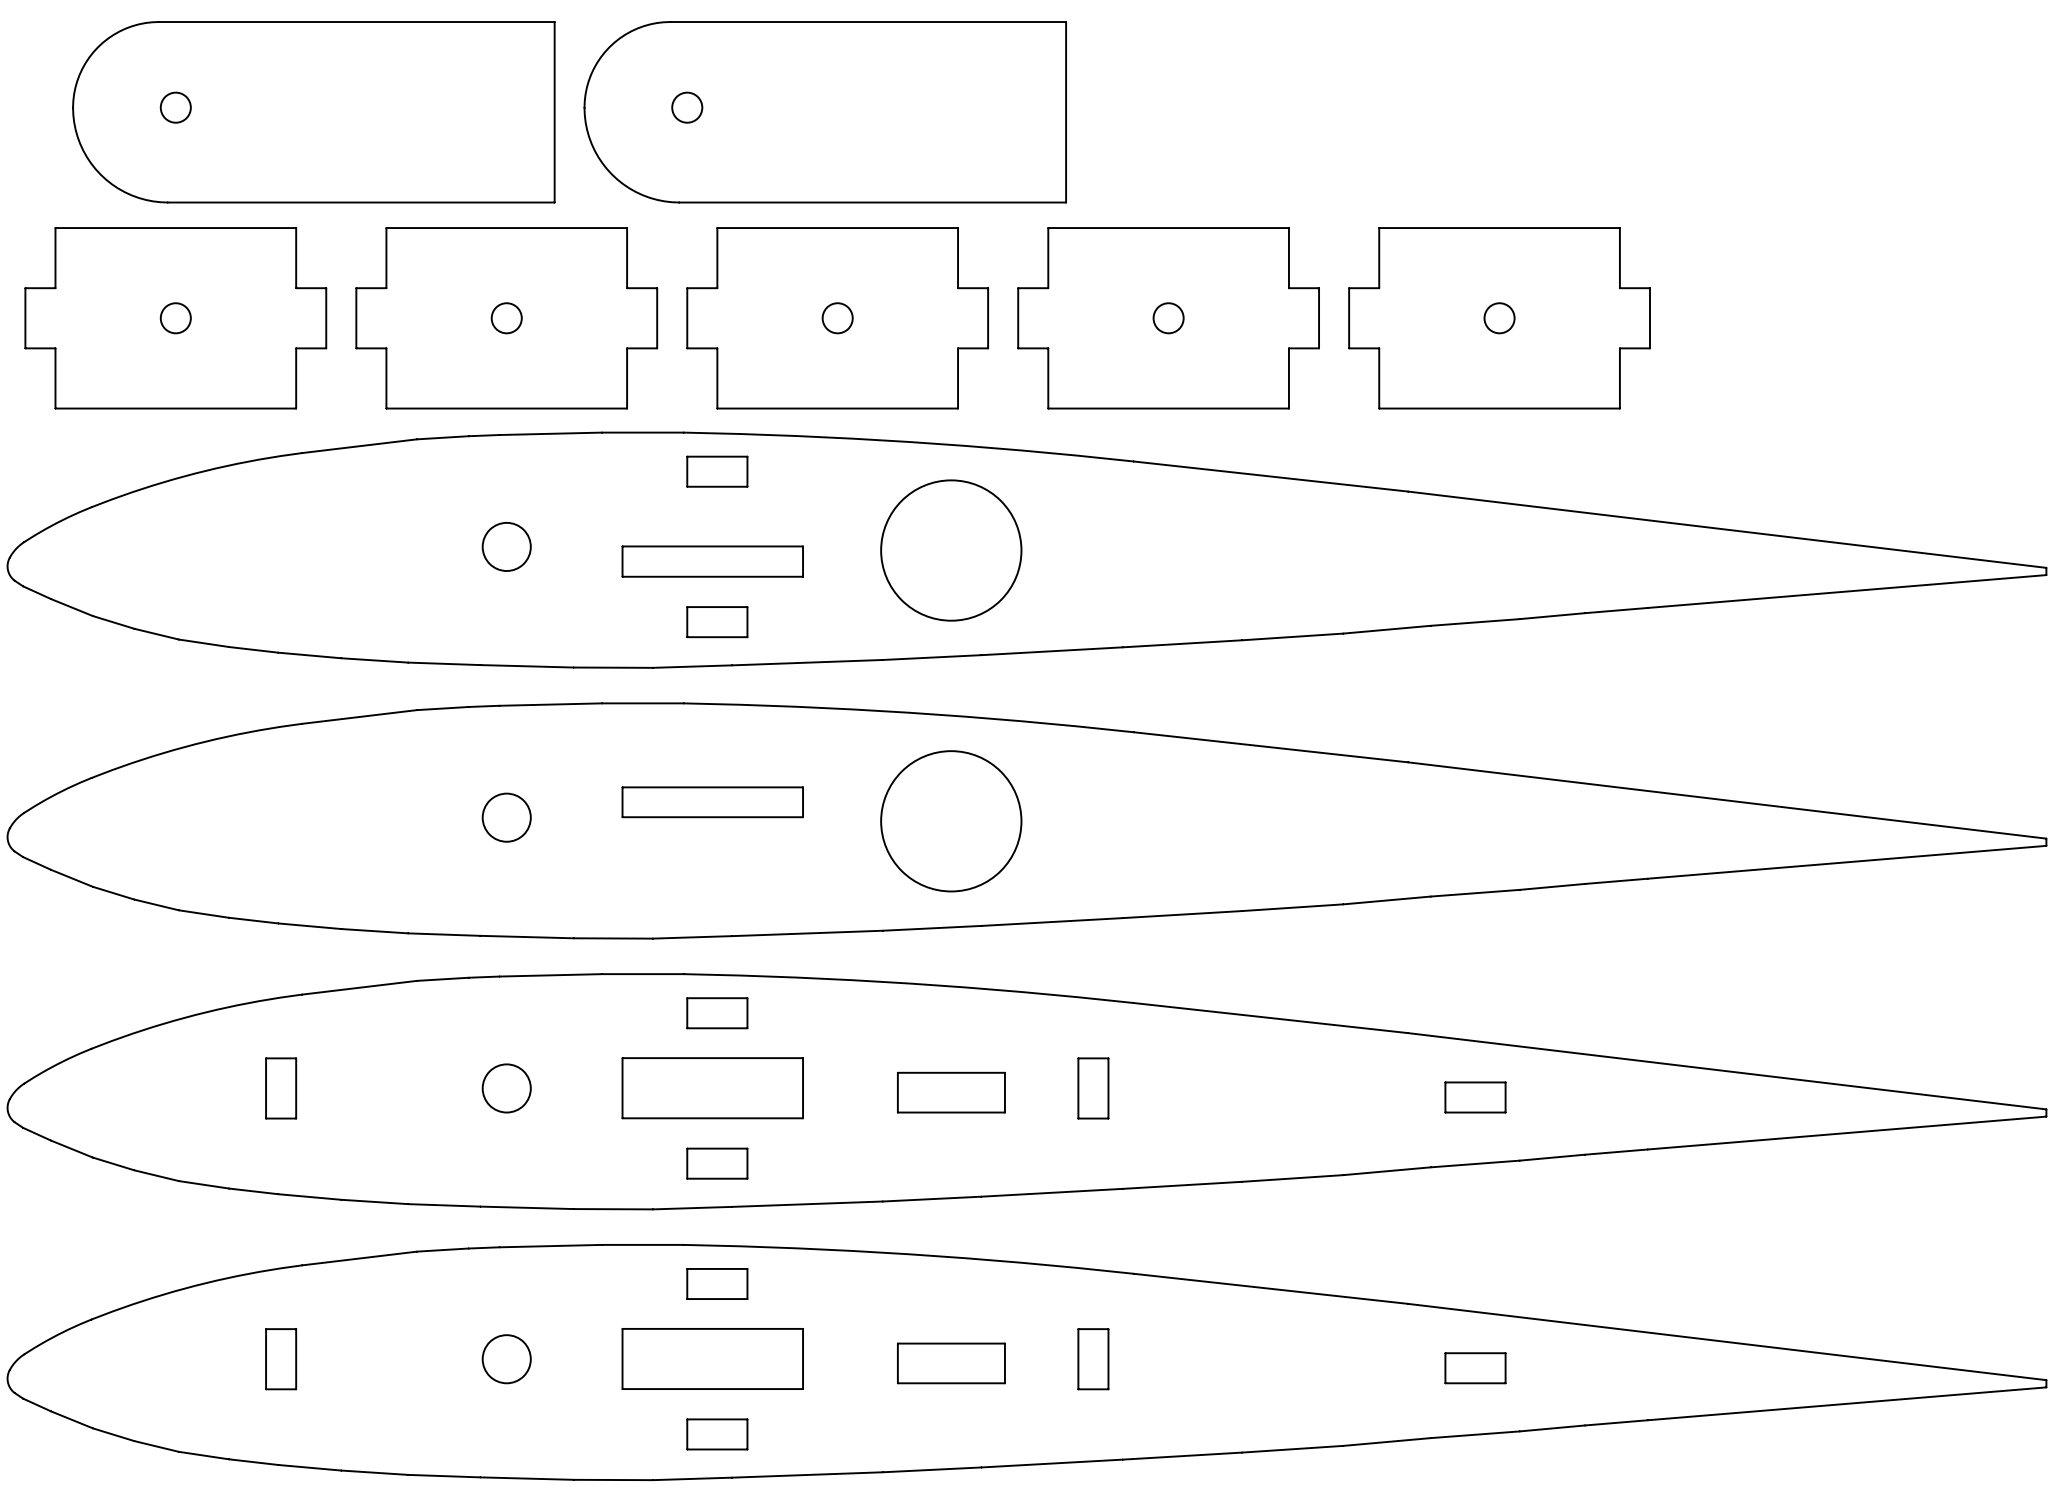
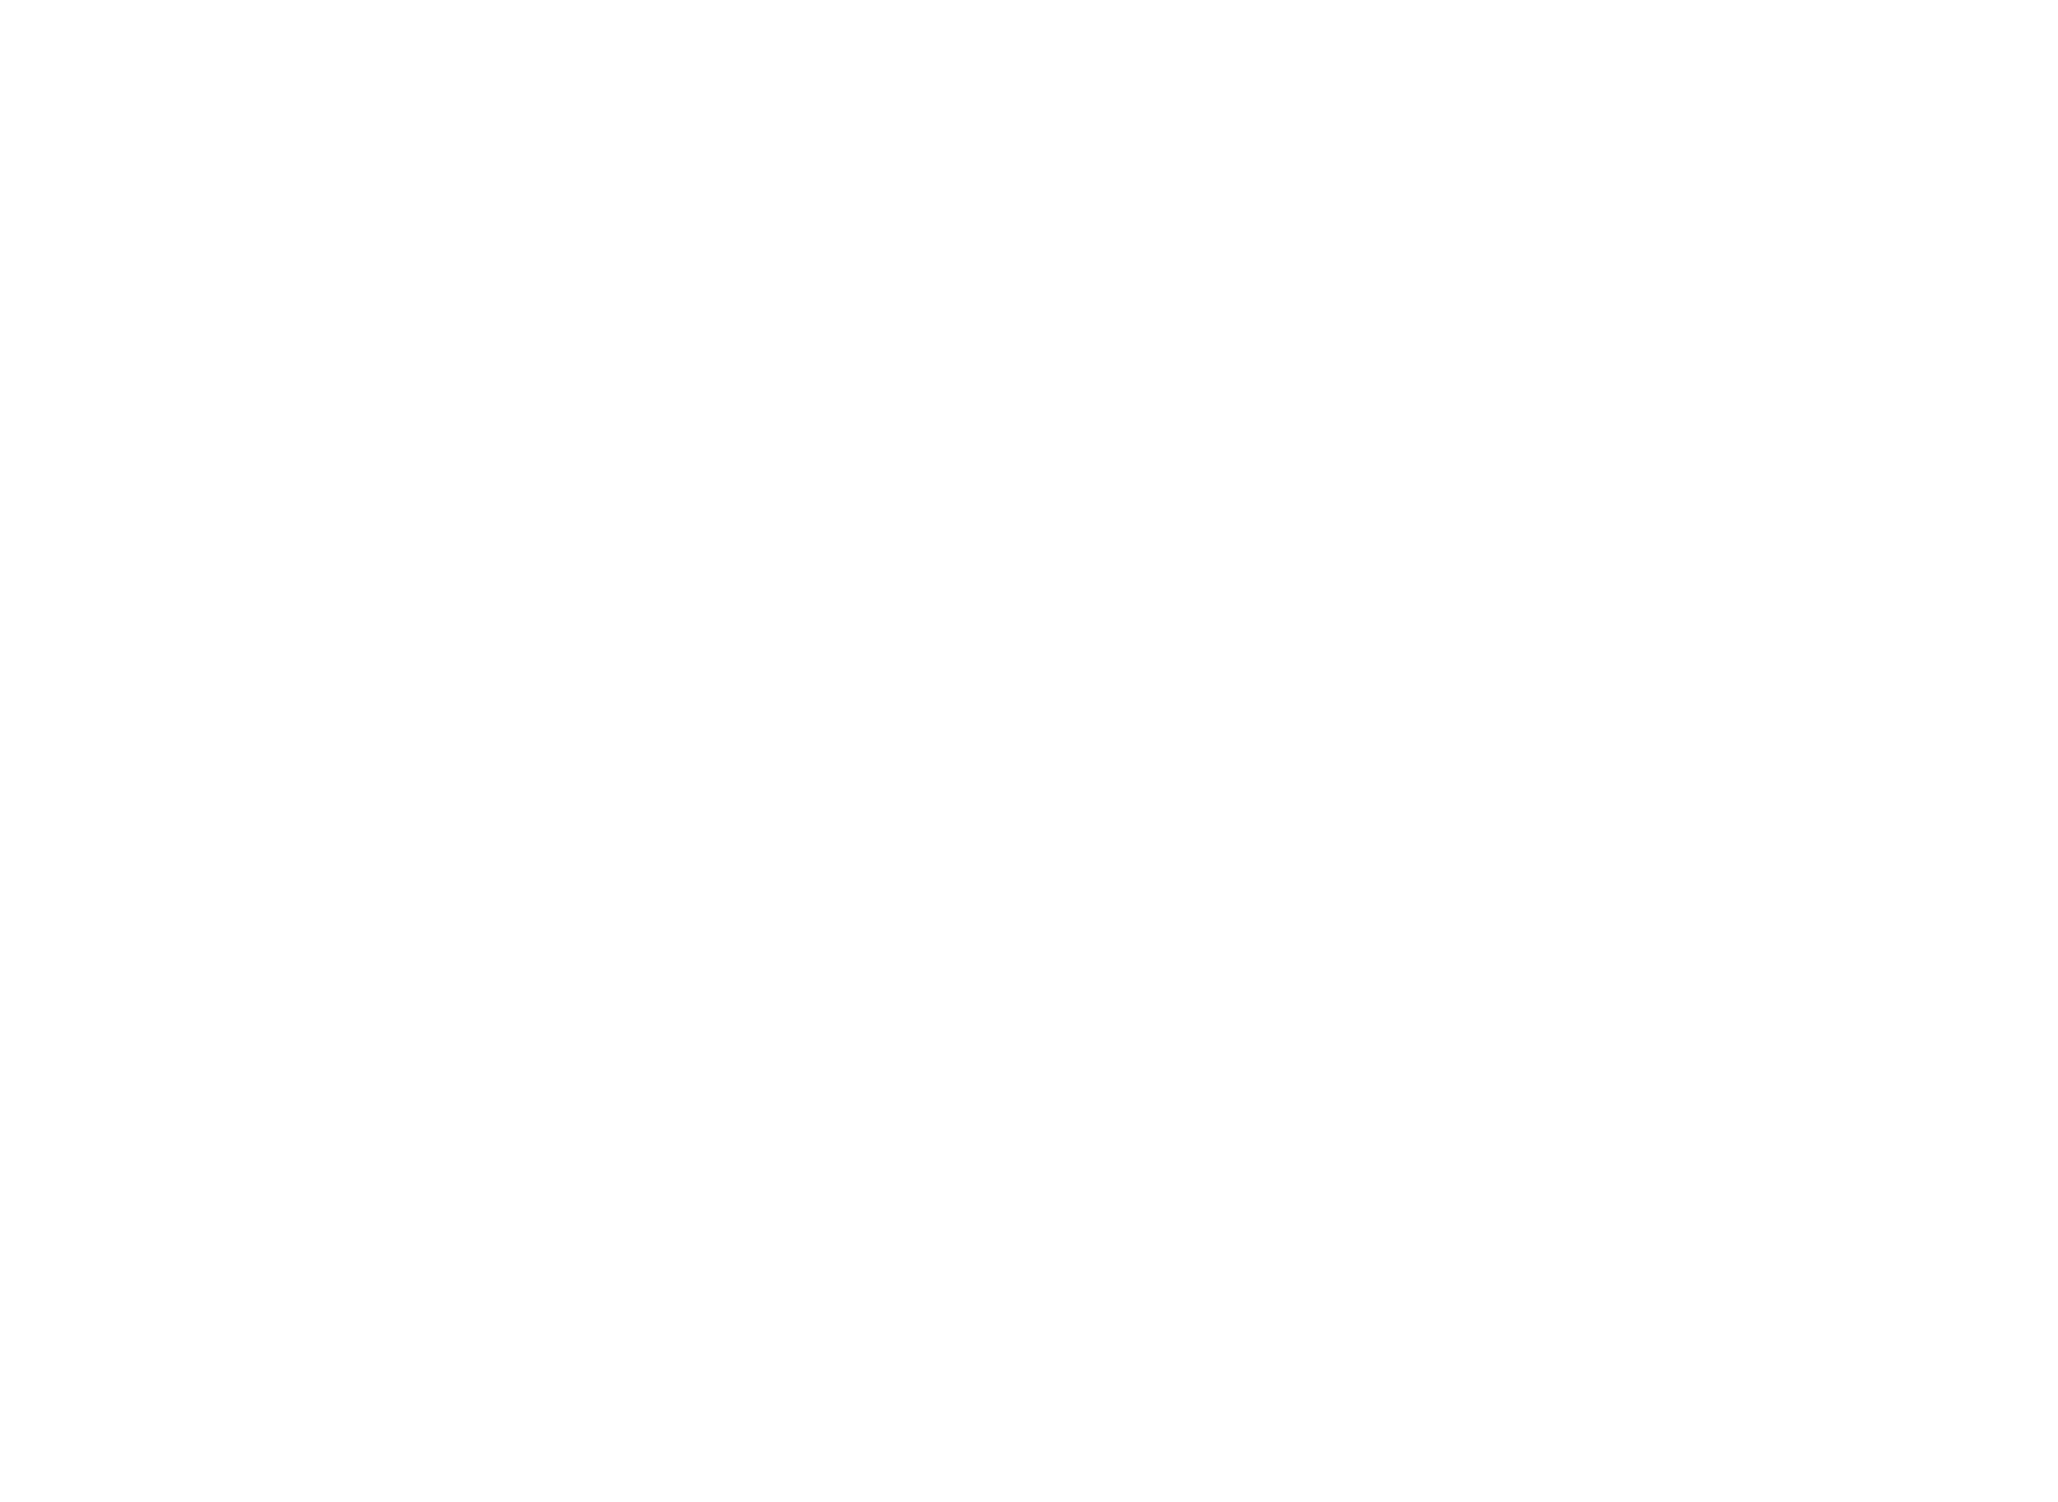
drawing: [6, 21, 2048, 1481] -> none

